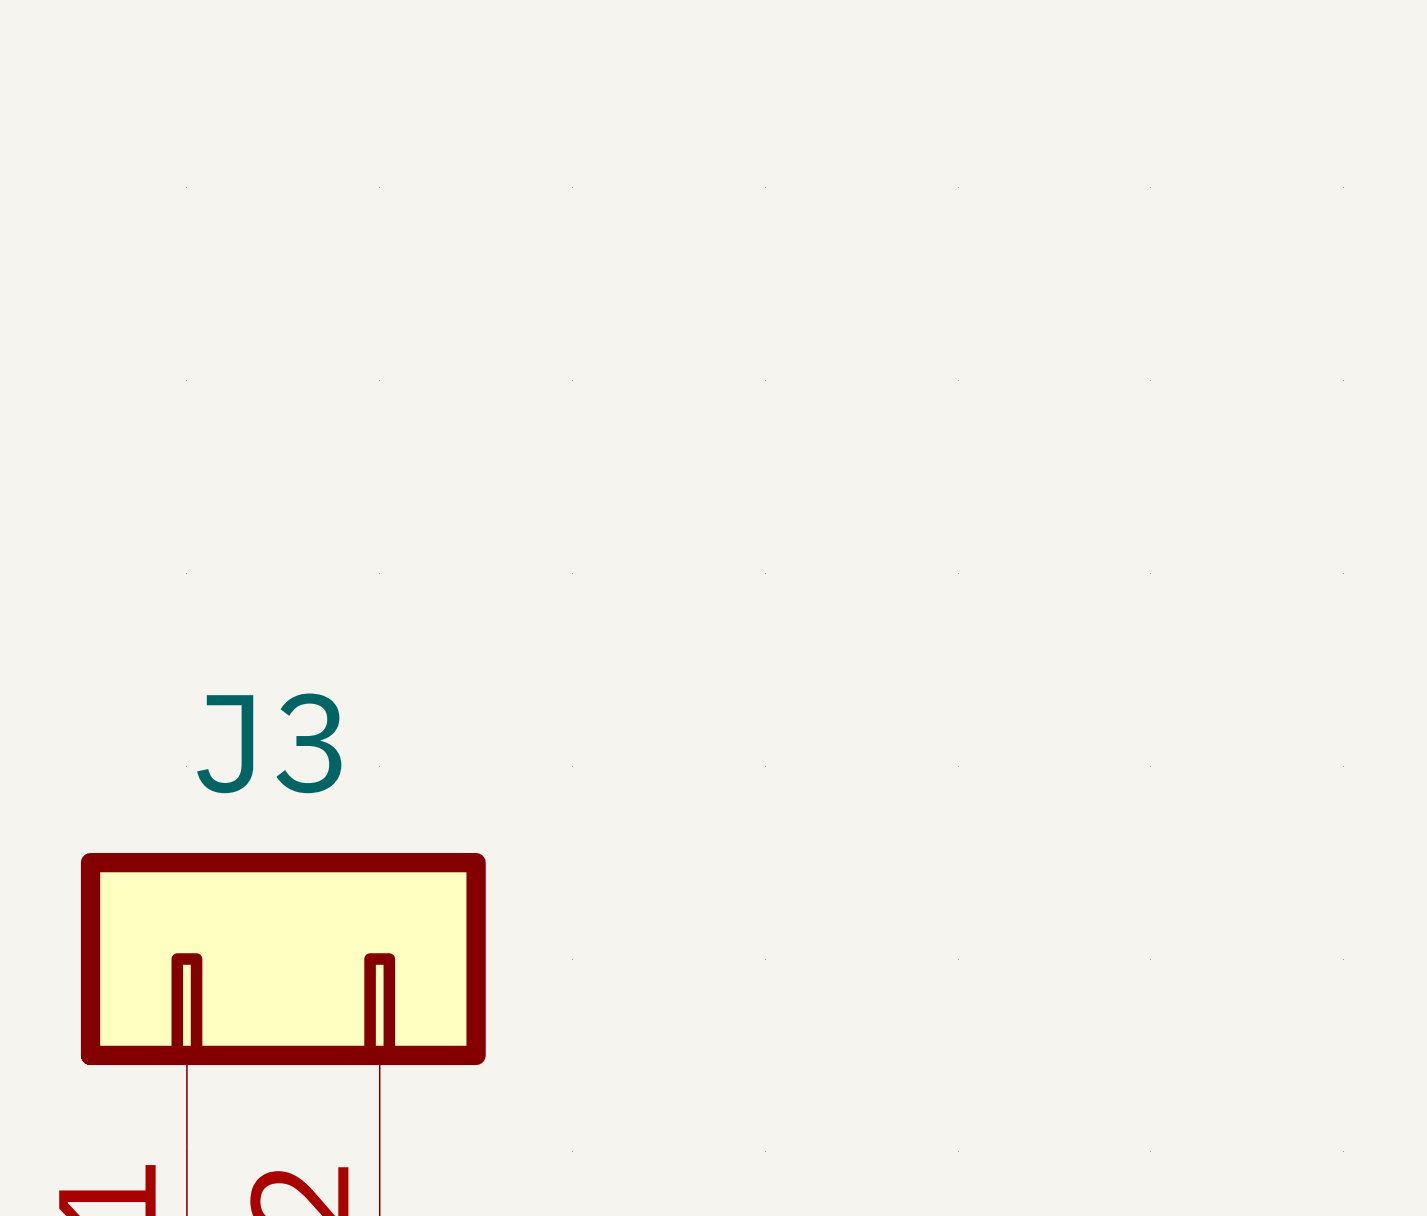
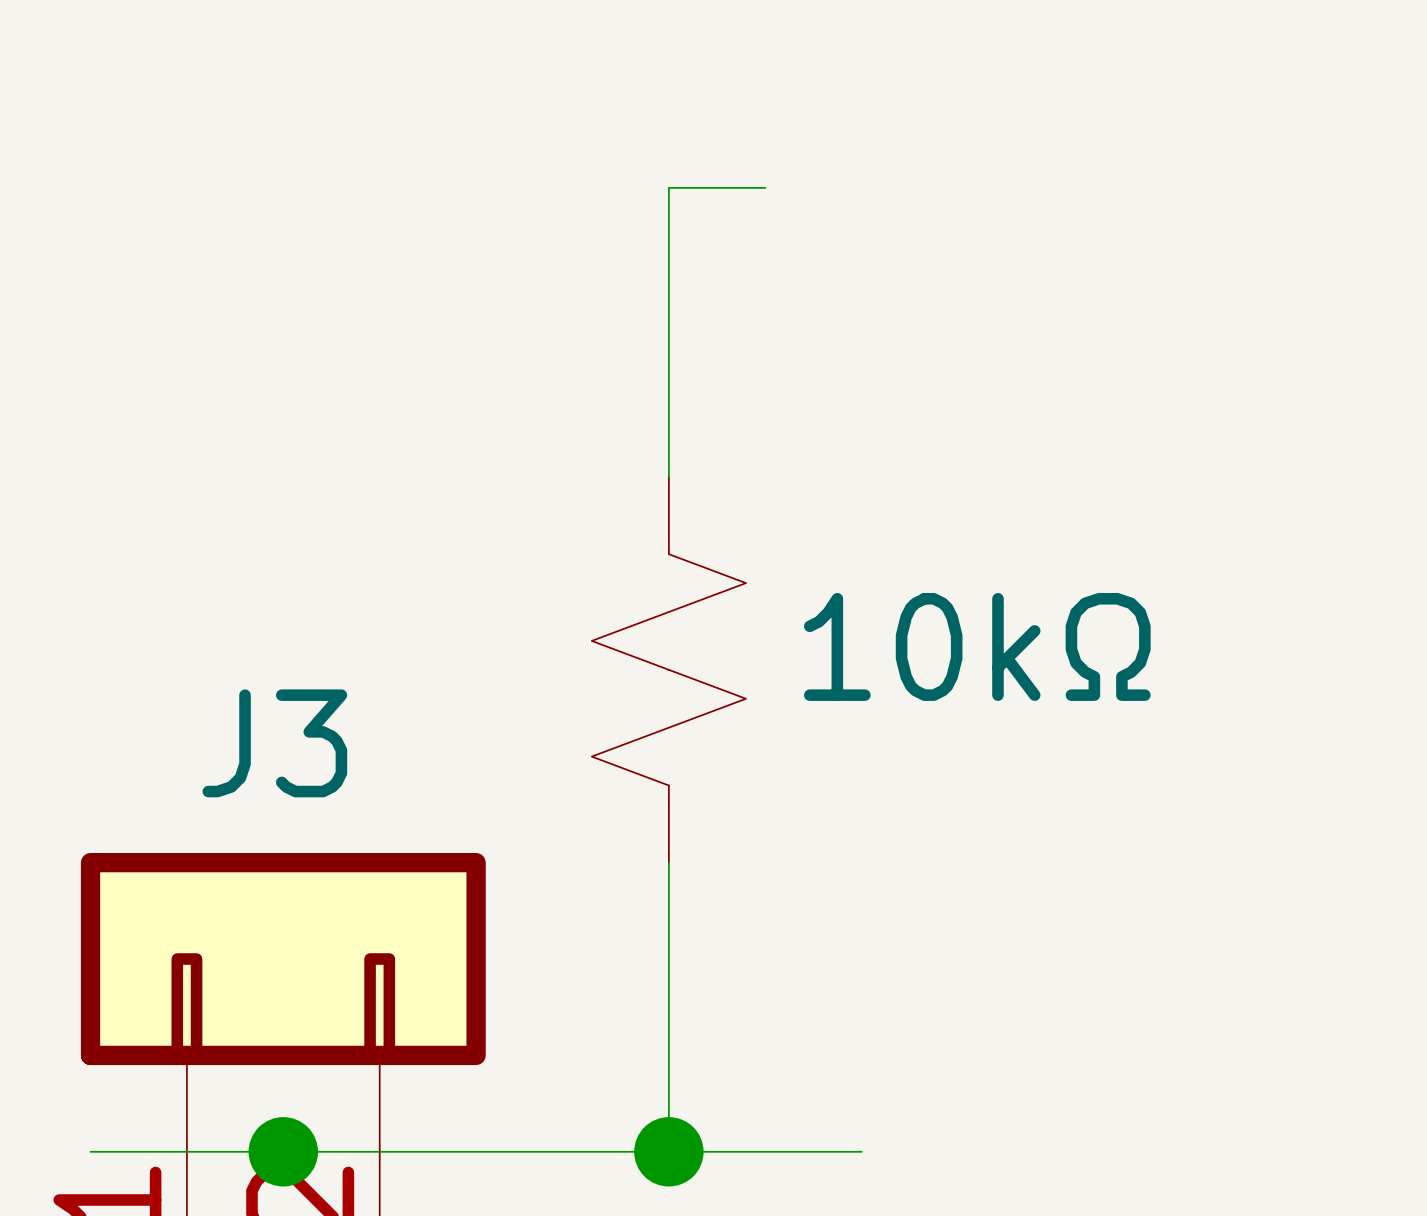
wire: none -> (765, 187) (668, 187) (668, 477)
part: none -> 10kΩ (668, 669)
wire: none -> (668, 862) (668, 1151)
wire: none -> (90, 1151) (861, 1151)
junction: none -> (283, 1151)
junction: none -> (668, 1151)

